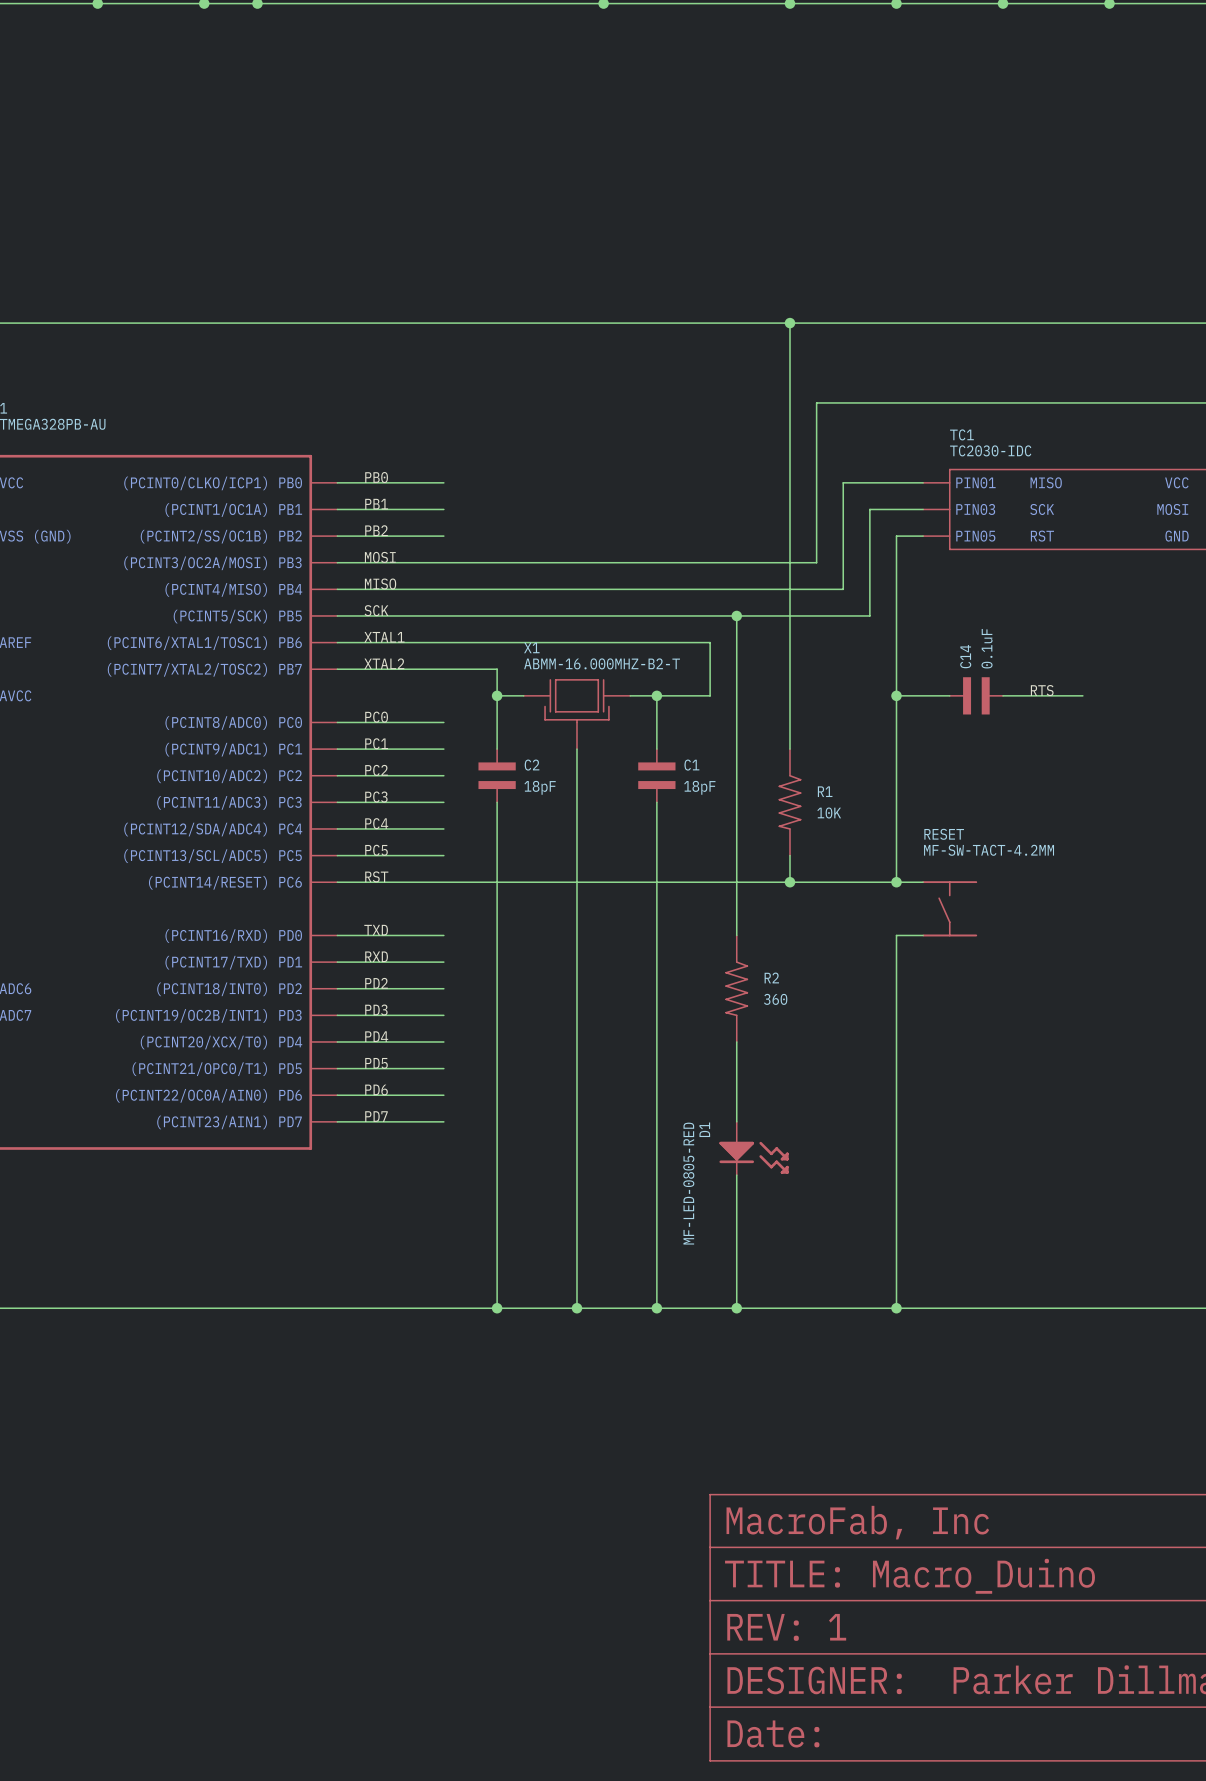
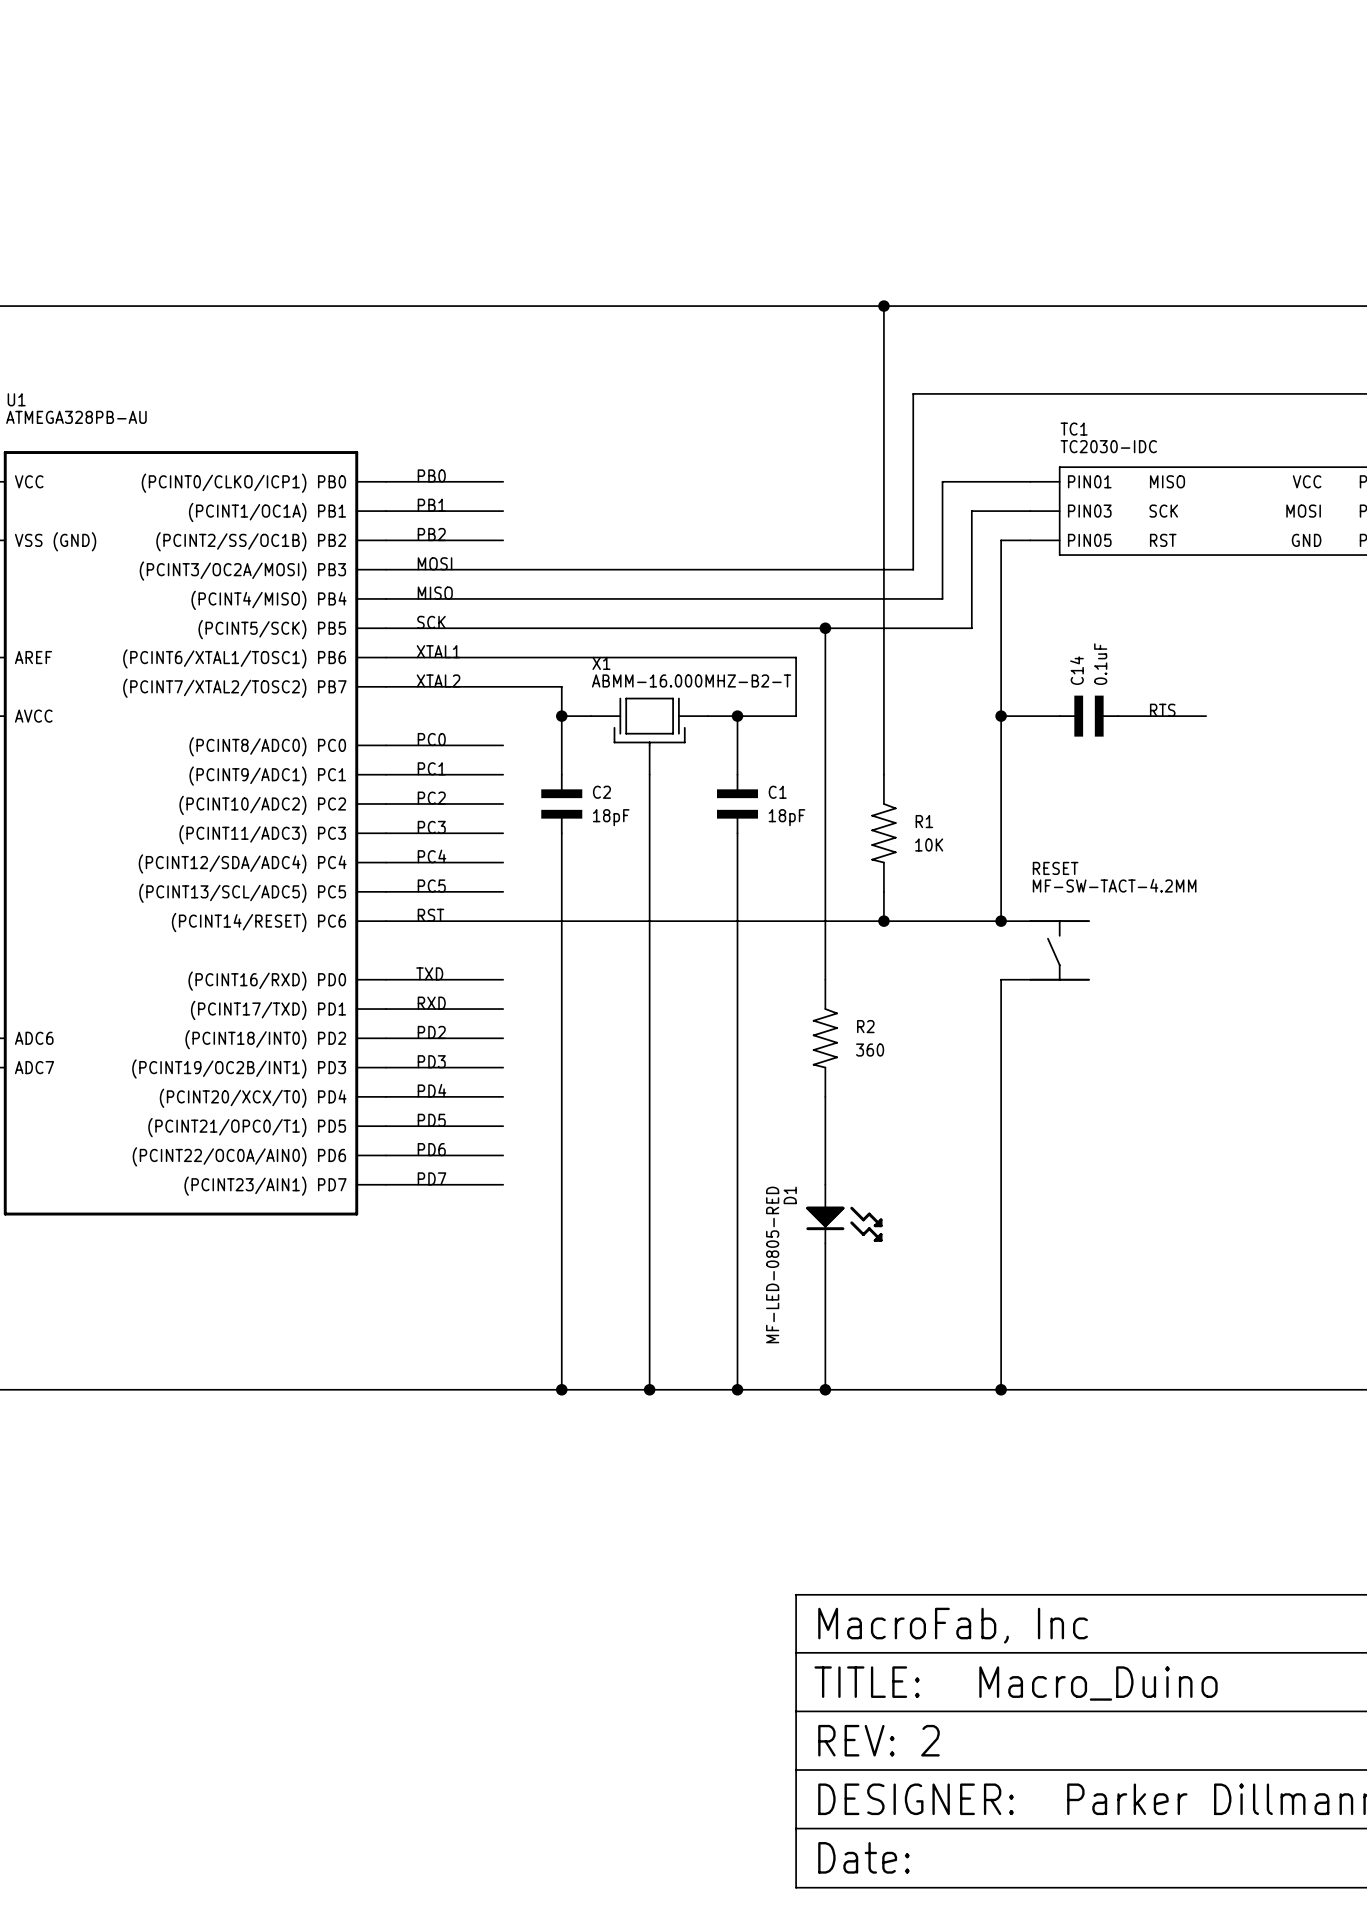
part text: REV: 1 (786, 1627) -> REV: 2 (879, 1740)

